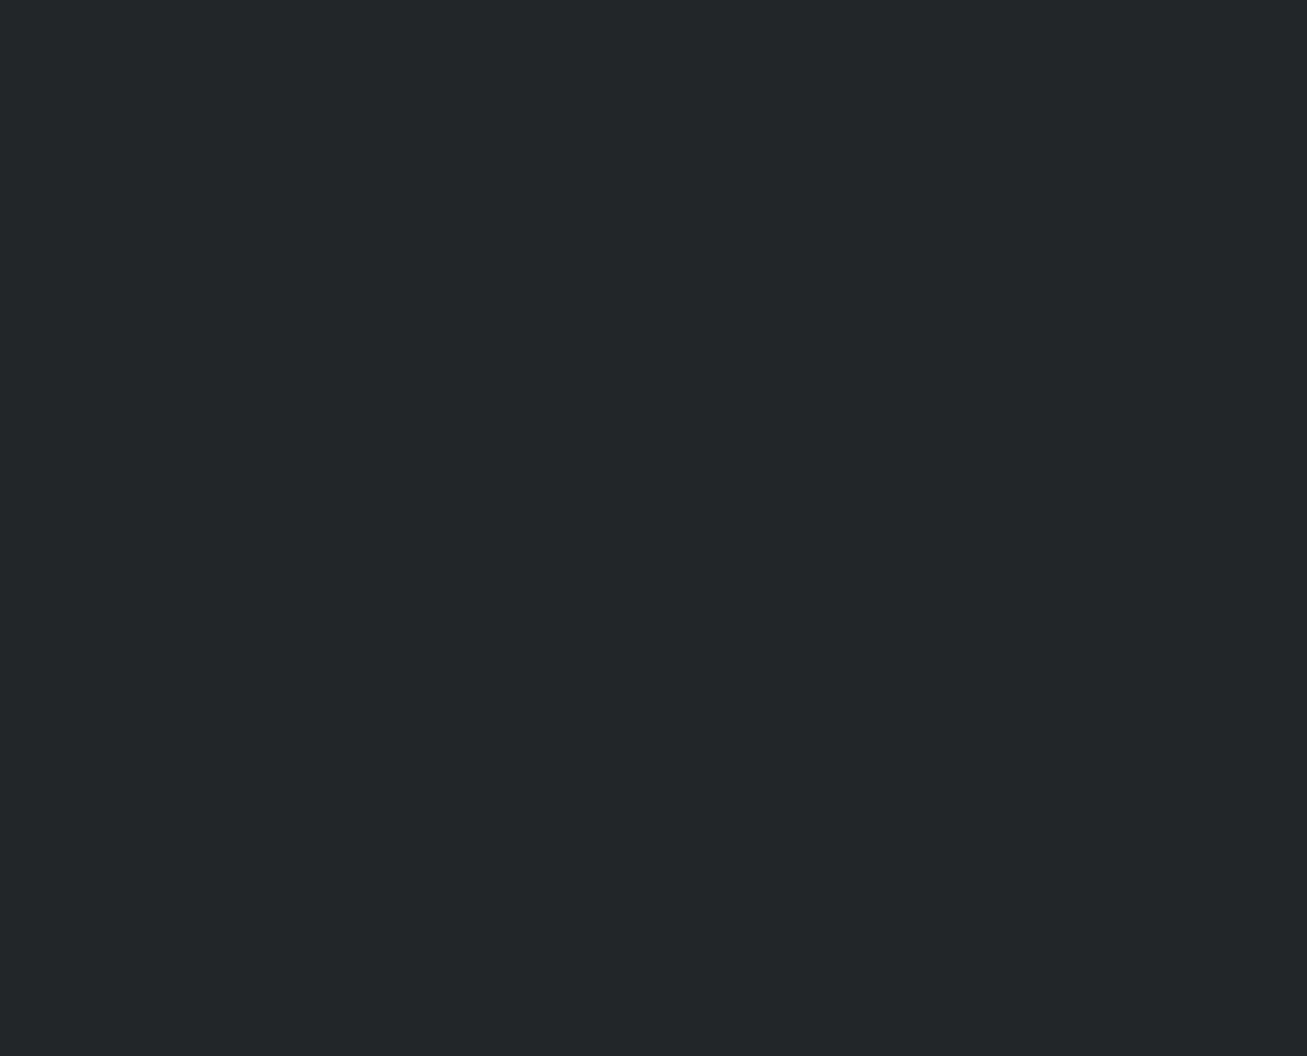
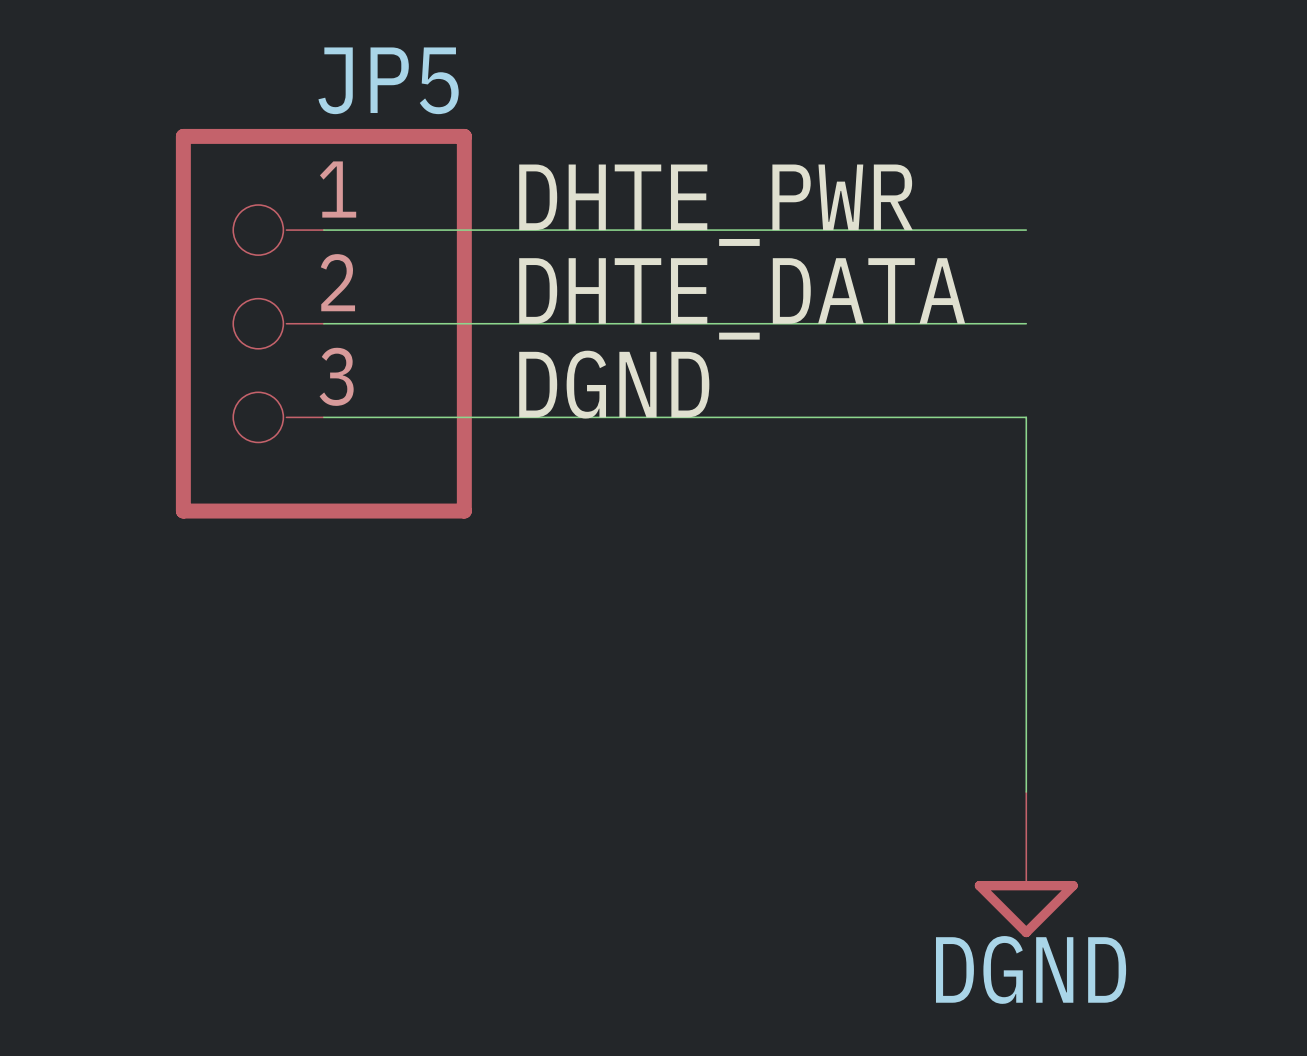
label: none -> DHTE_PWR (715, 205)
wire: none -> (323, 230) (1026, 230)
label: none -> DHTE_DATA (742, 298)
wire: none -> (323, 323) (1026, 323)
JP5: none -> (323, 323)
label: none -> DGND (614, 384)
wire: none -> (323, 417) (1026, 417) (1026, 792)
power symbol: none -> DGND (1026, 864)

